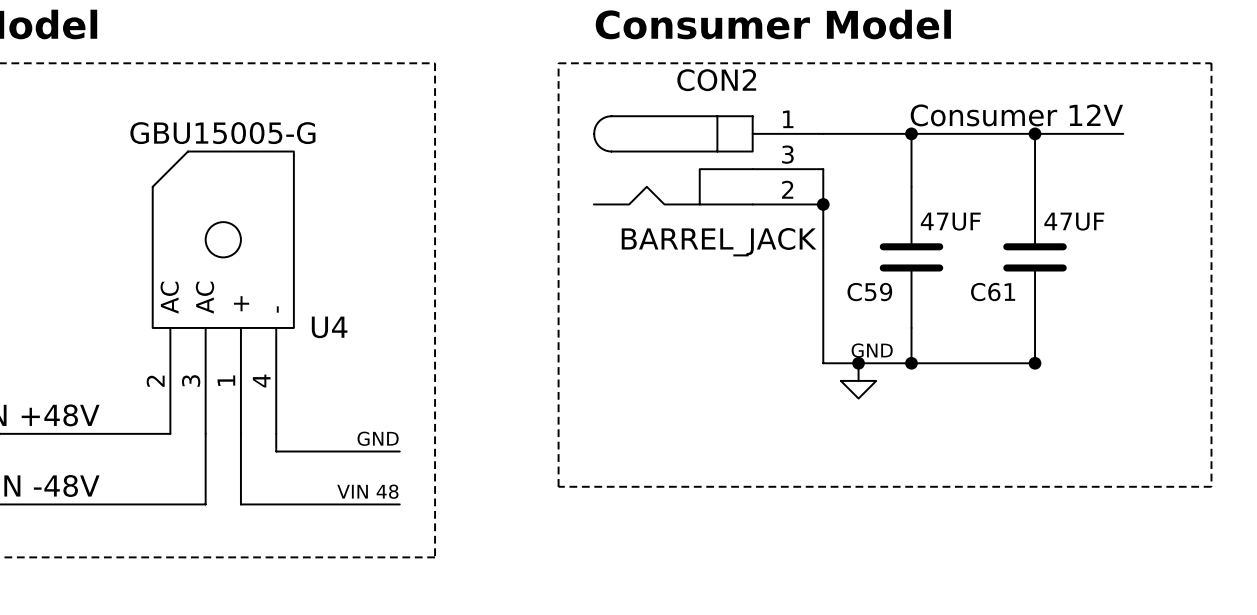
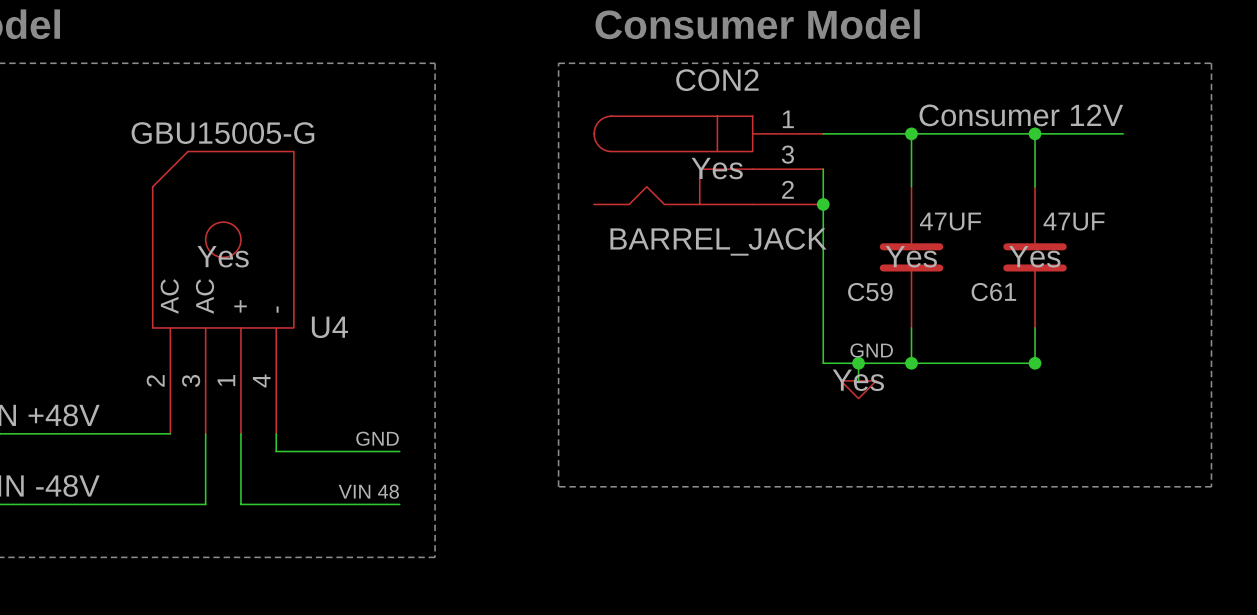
CON2 text: none -> Yes (717, 168)
U4 text: none -> Yes (223, 256)
C59 text: none -> Yes (911, 256)
C61 text: none -> Yes (1034, 256)
power symbol text: none -> Yes (858, 380)

